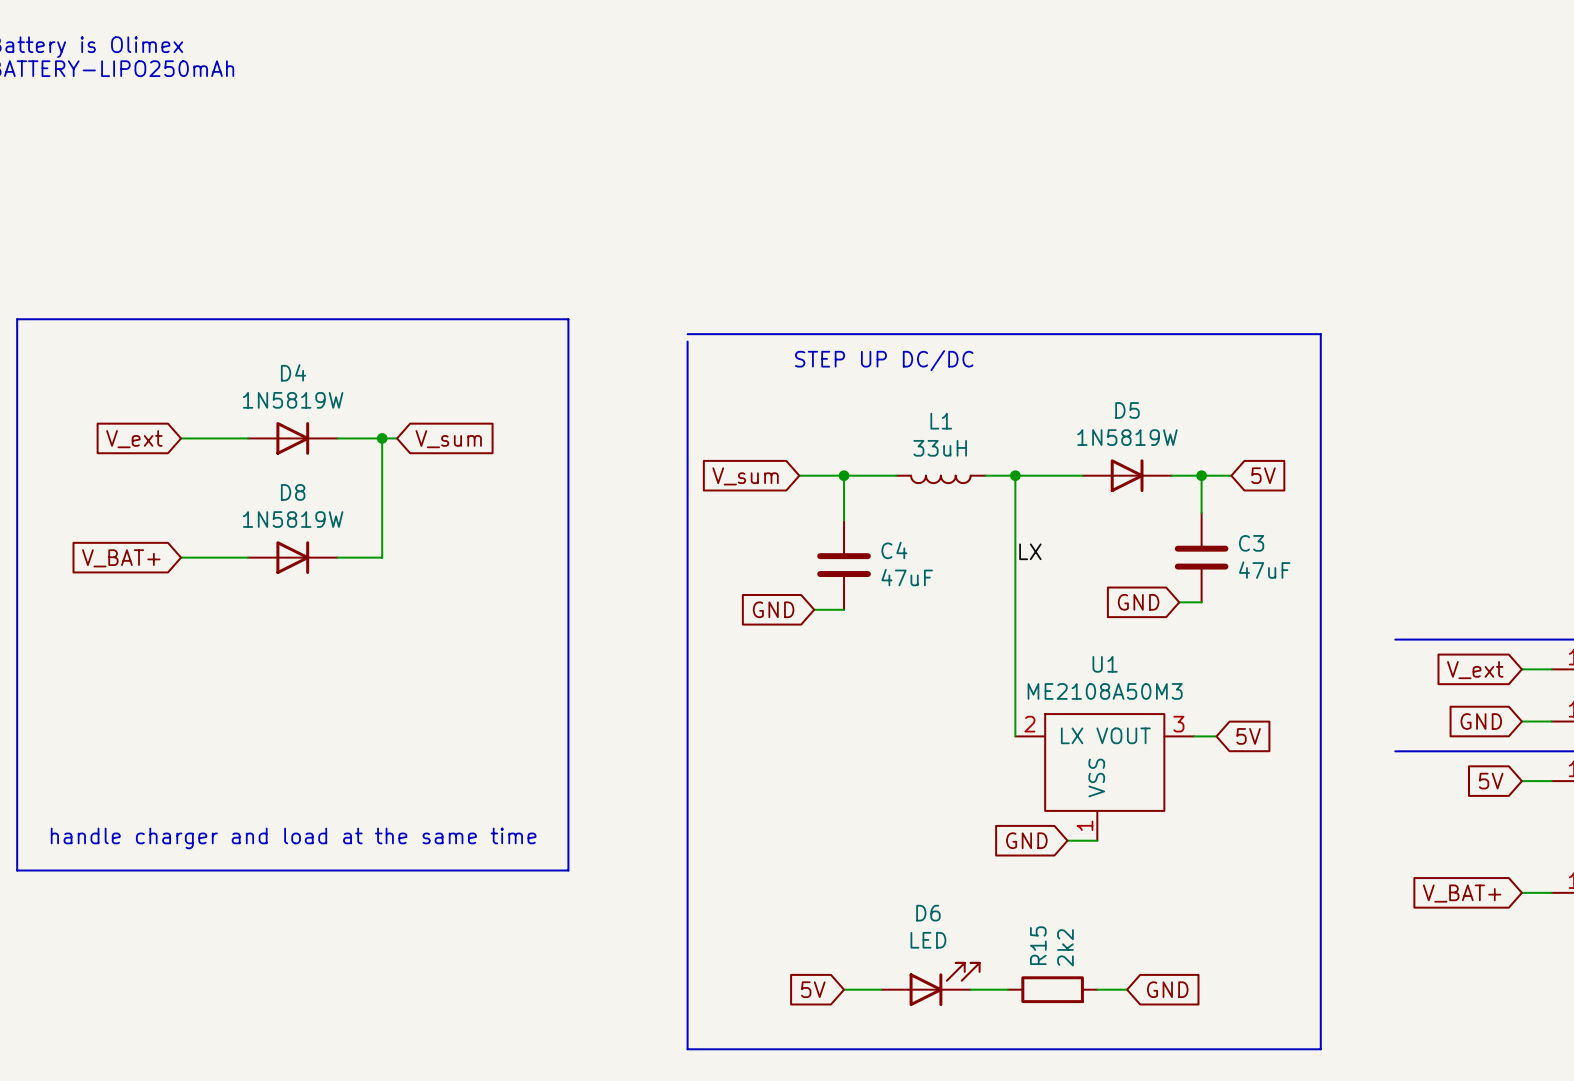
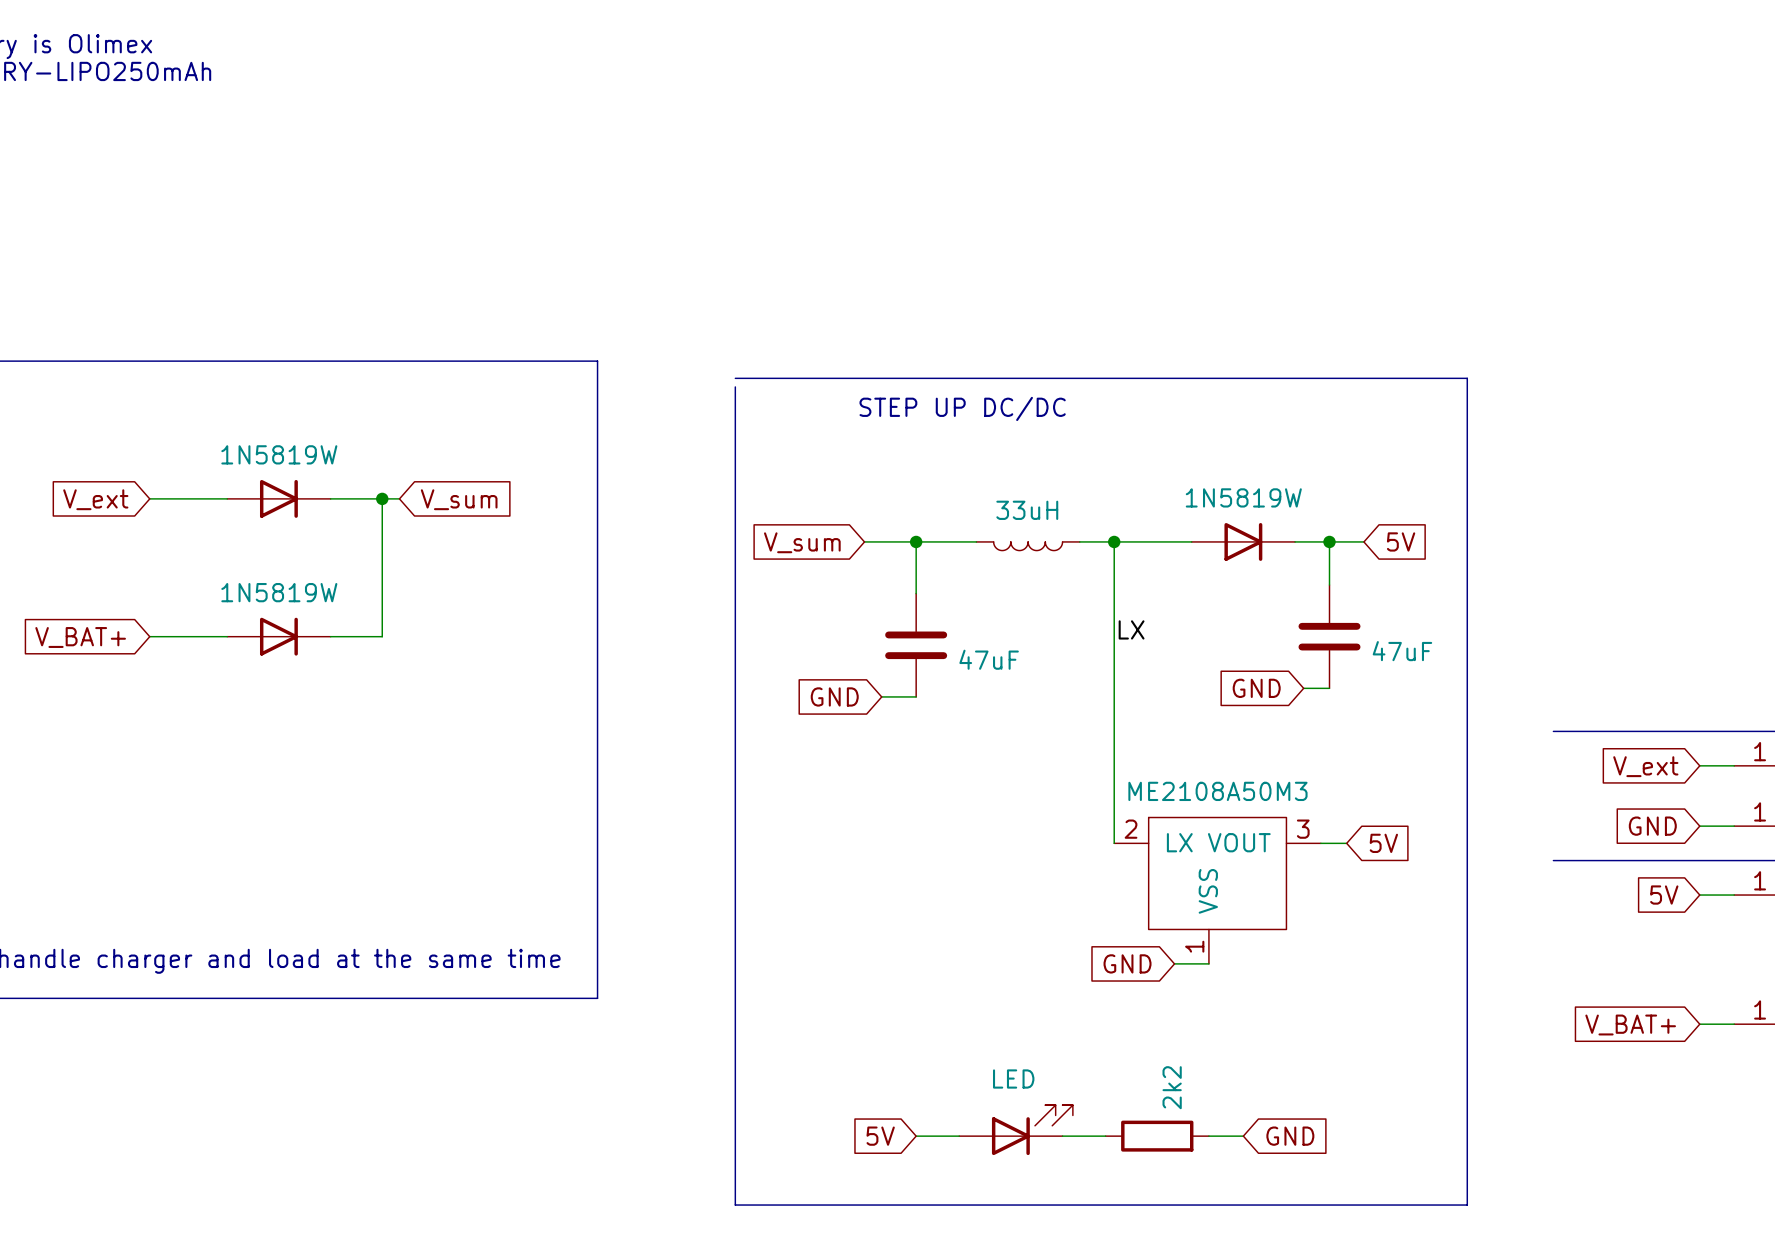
D4 name: D4 (293, 372) -> none
D5 name: D5 (1127, 410) -> none
L1 name: L1 (941, 421) -> none
D8 name: D8 (293, 492) -> none
C3 name: C3 (1251, 543) -> none
C4 name: C4 (894, 550) -> none
U1 name: U1 (1105, 664) -> none
D6 name: D6 (928, 913) -> none
R15 name: R15 (1038, 945) -> none

